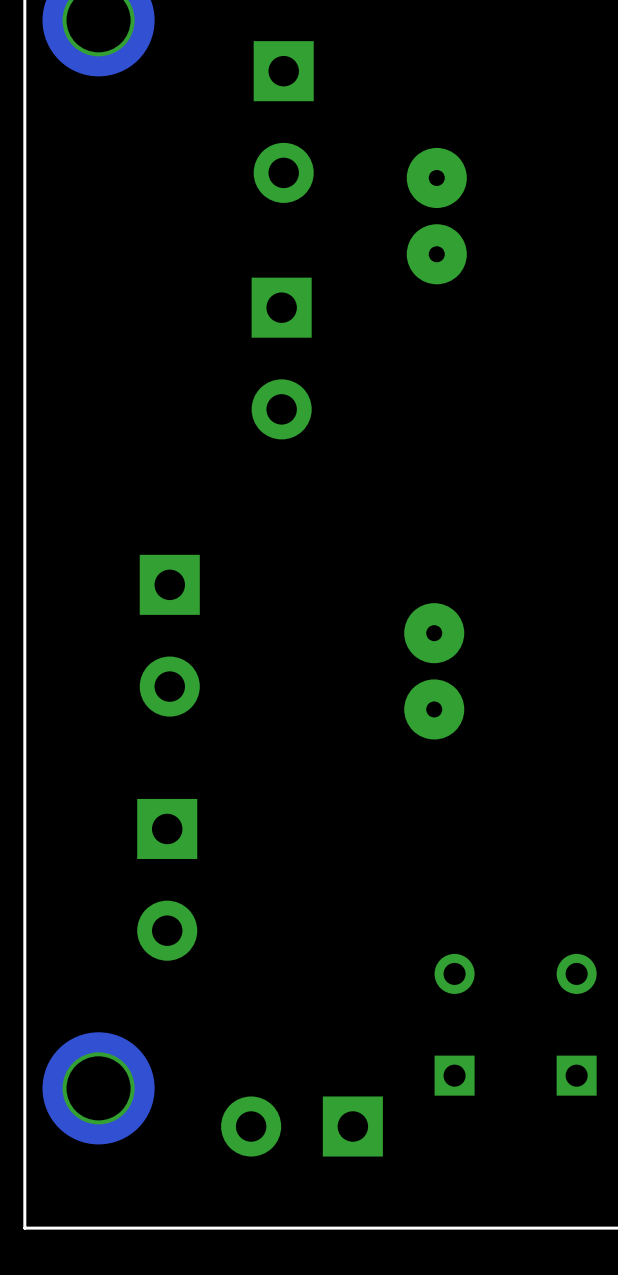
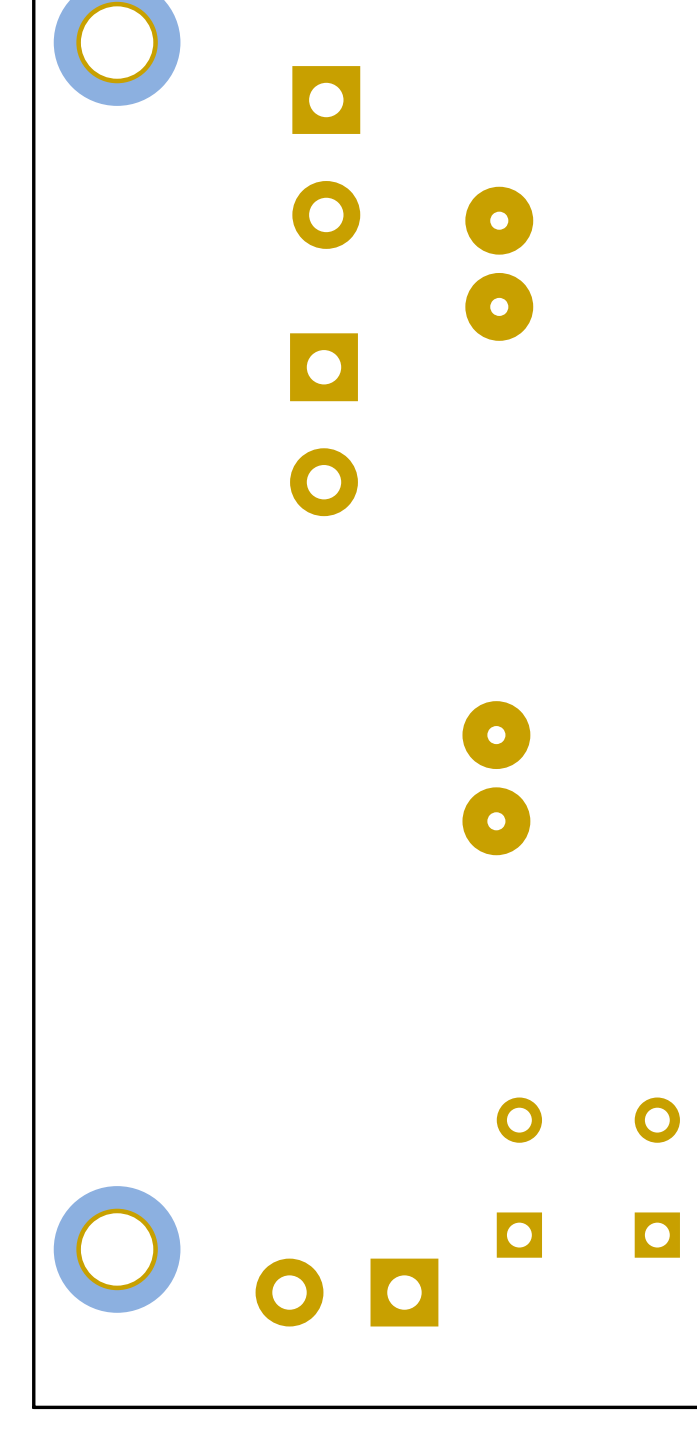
part: (169, 635) -> none
part: (167, 879) -> none

